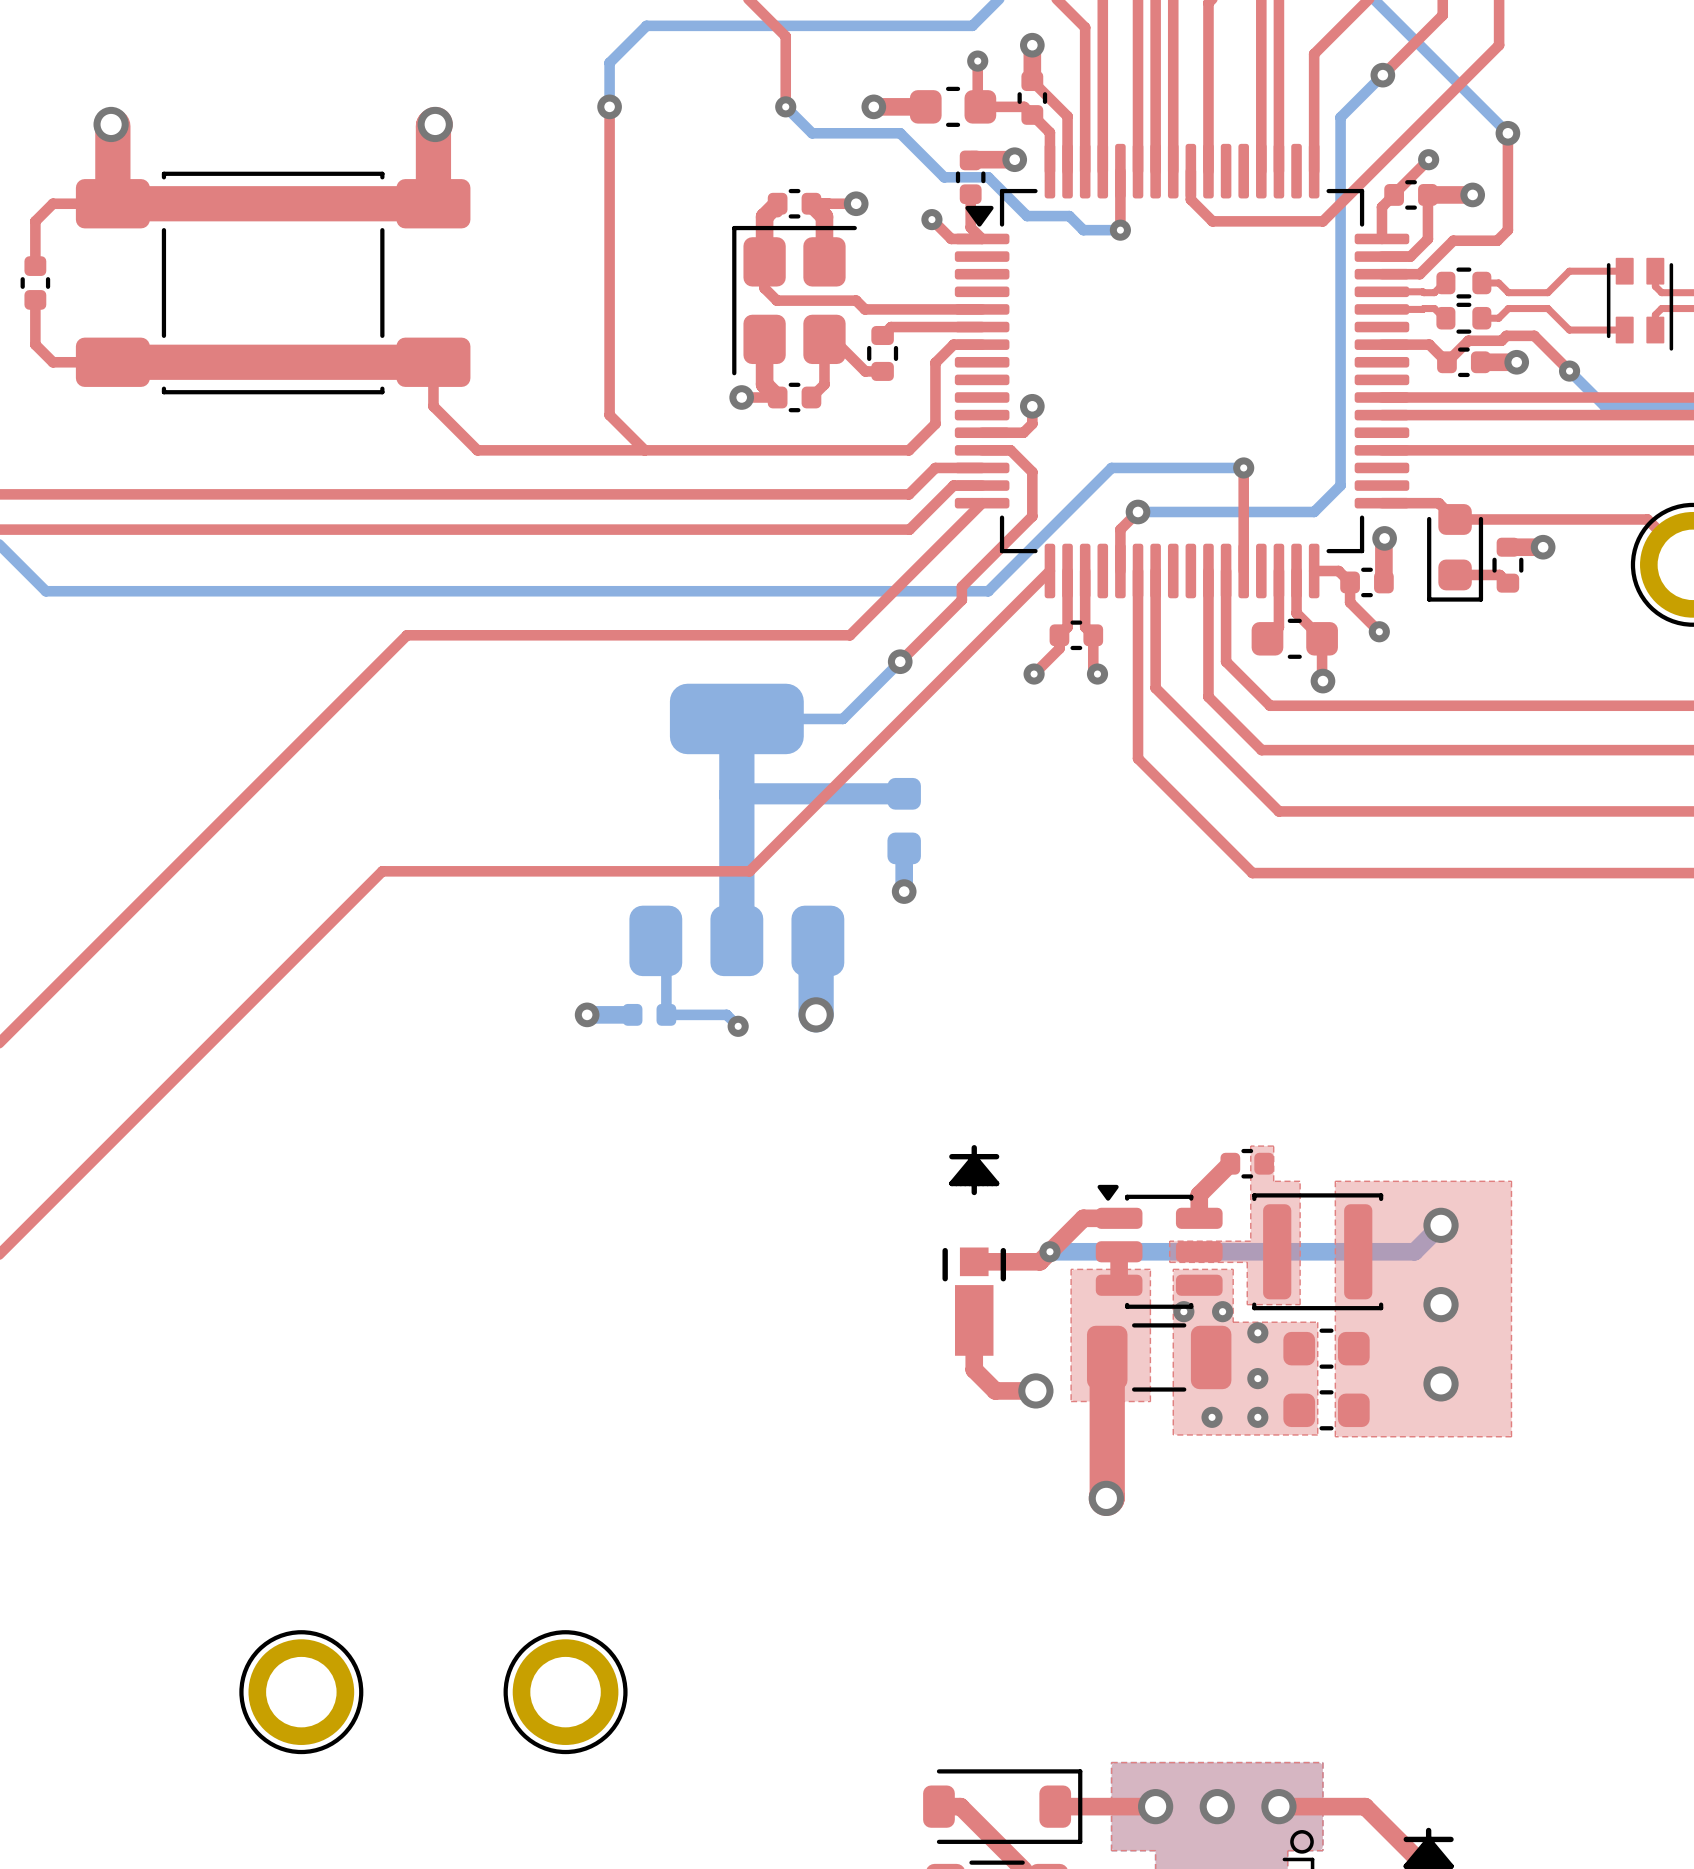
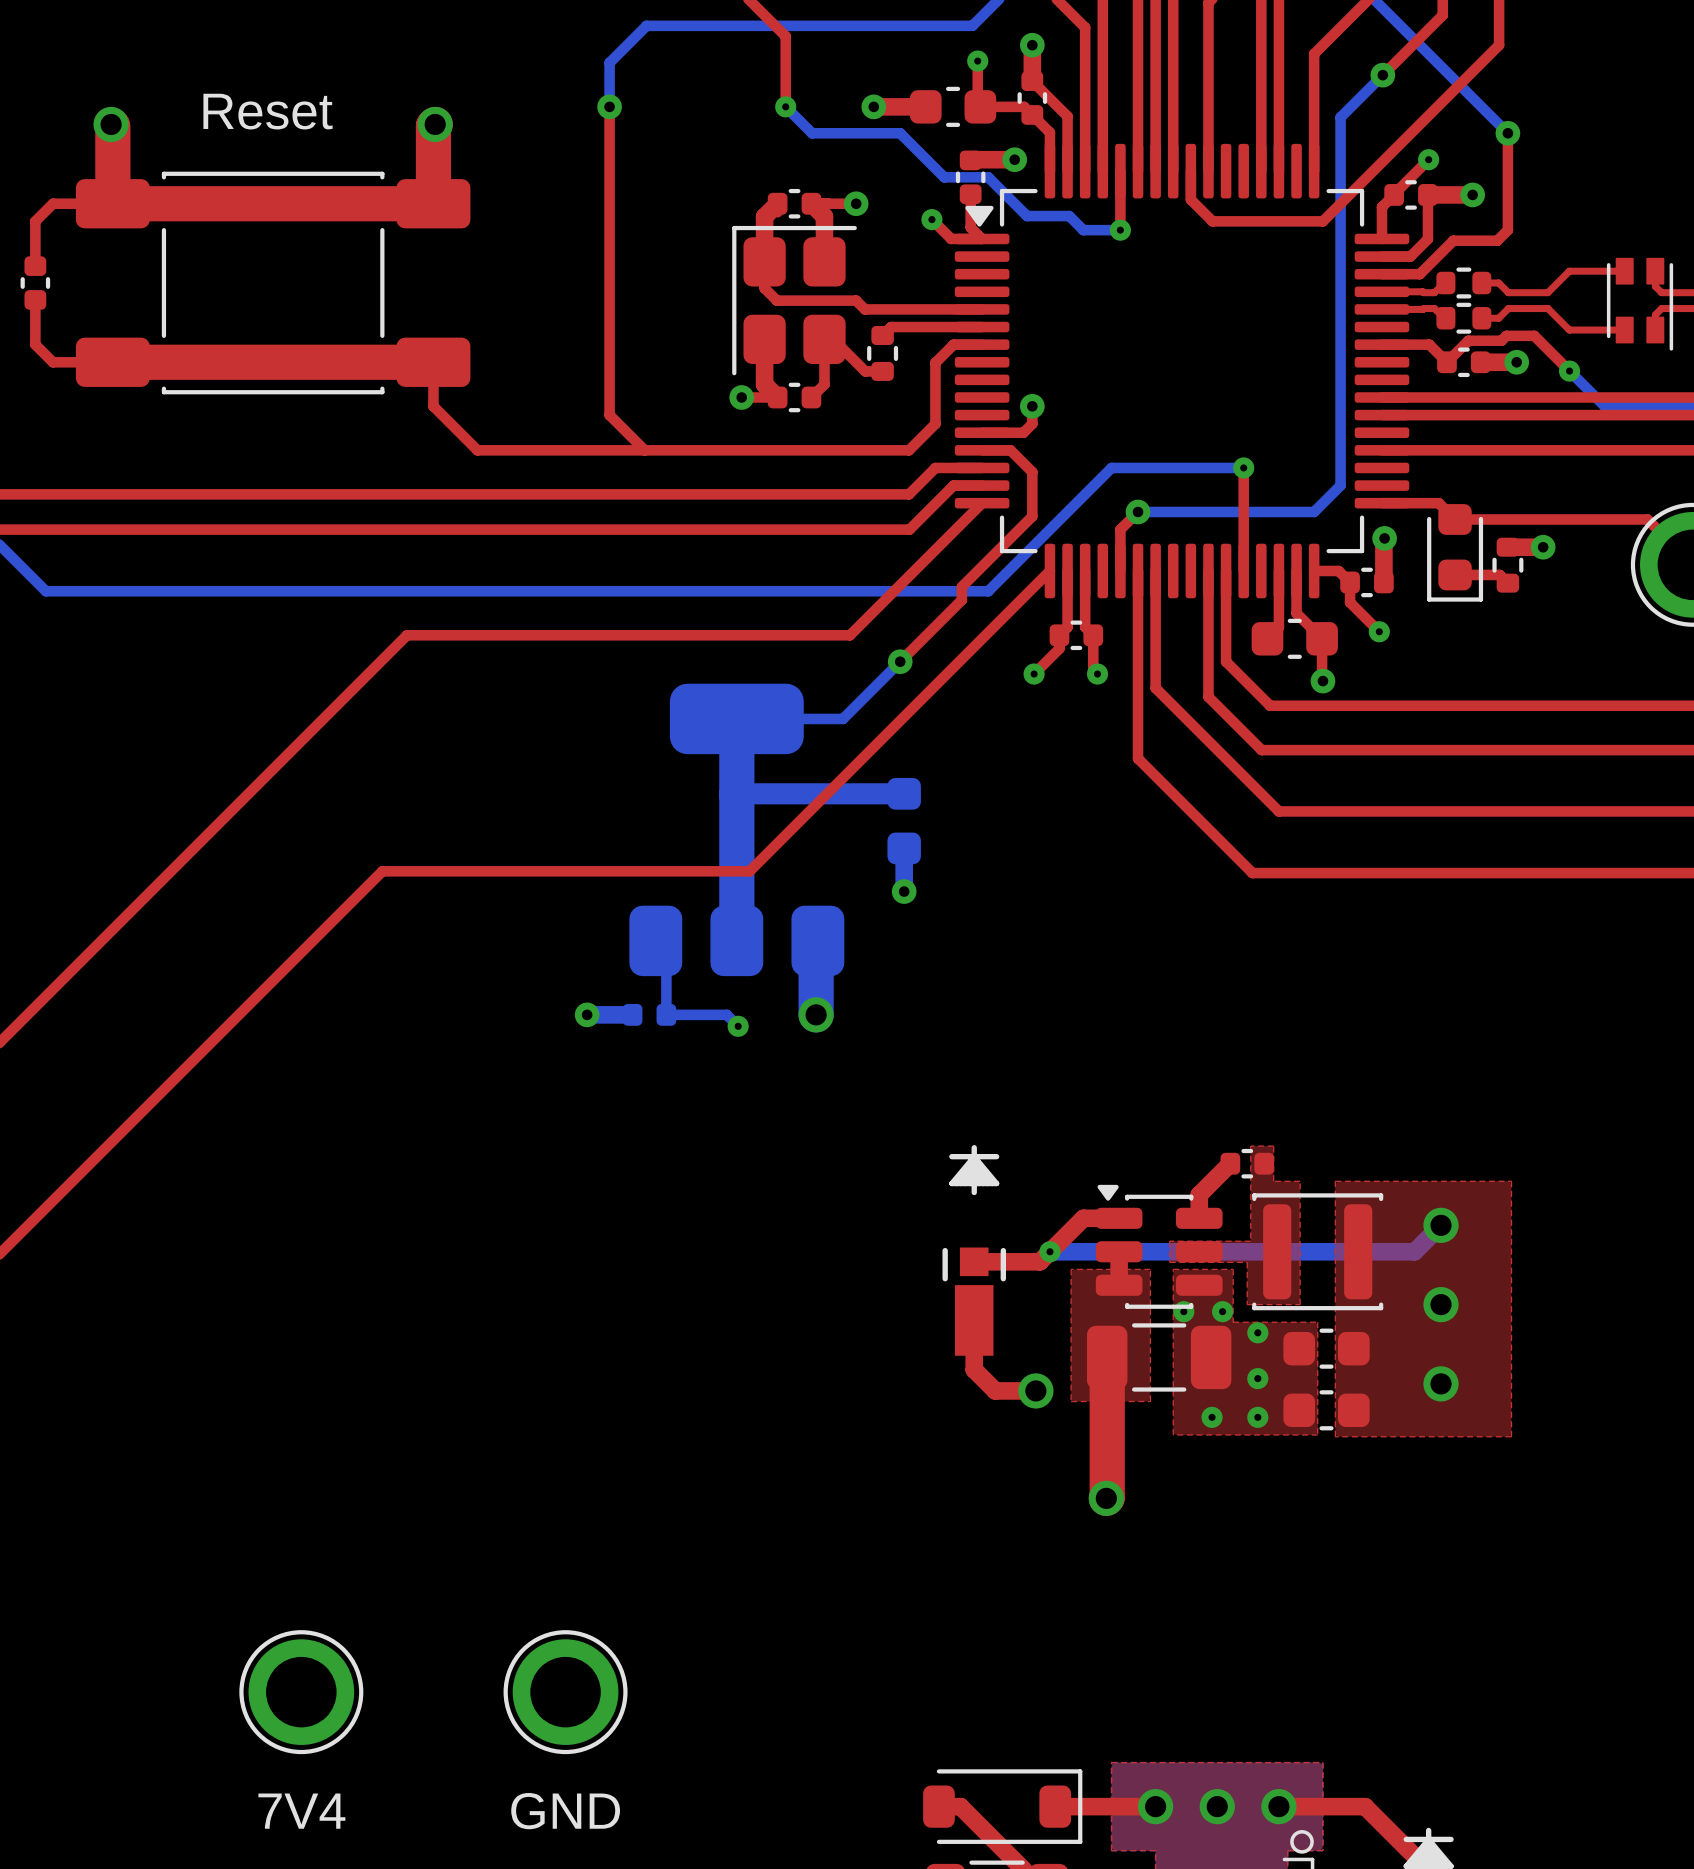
text: none -> Reset (268, 111)
text: none -> 7V4 (301, 1811)
text: none -> GND (565, 1811)

